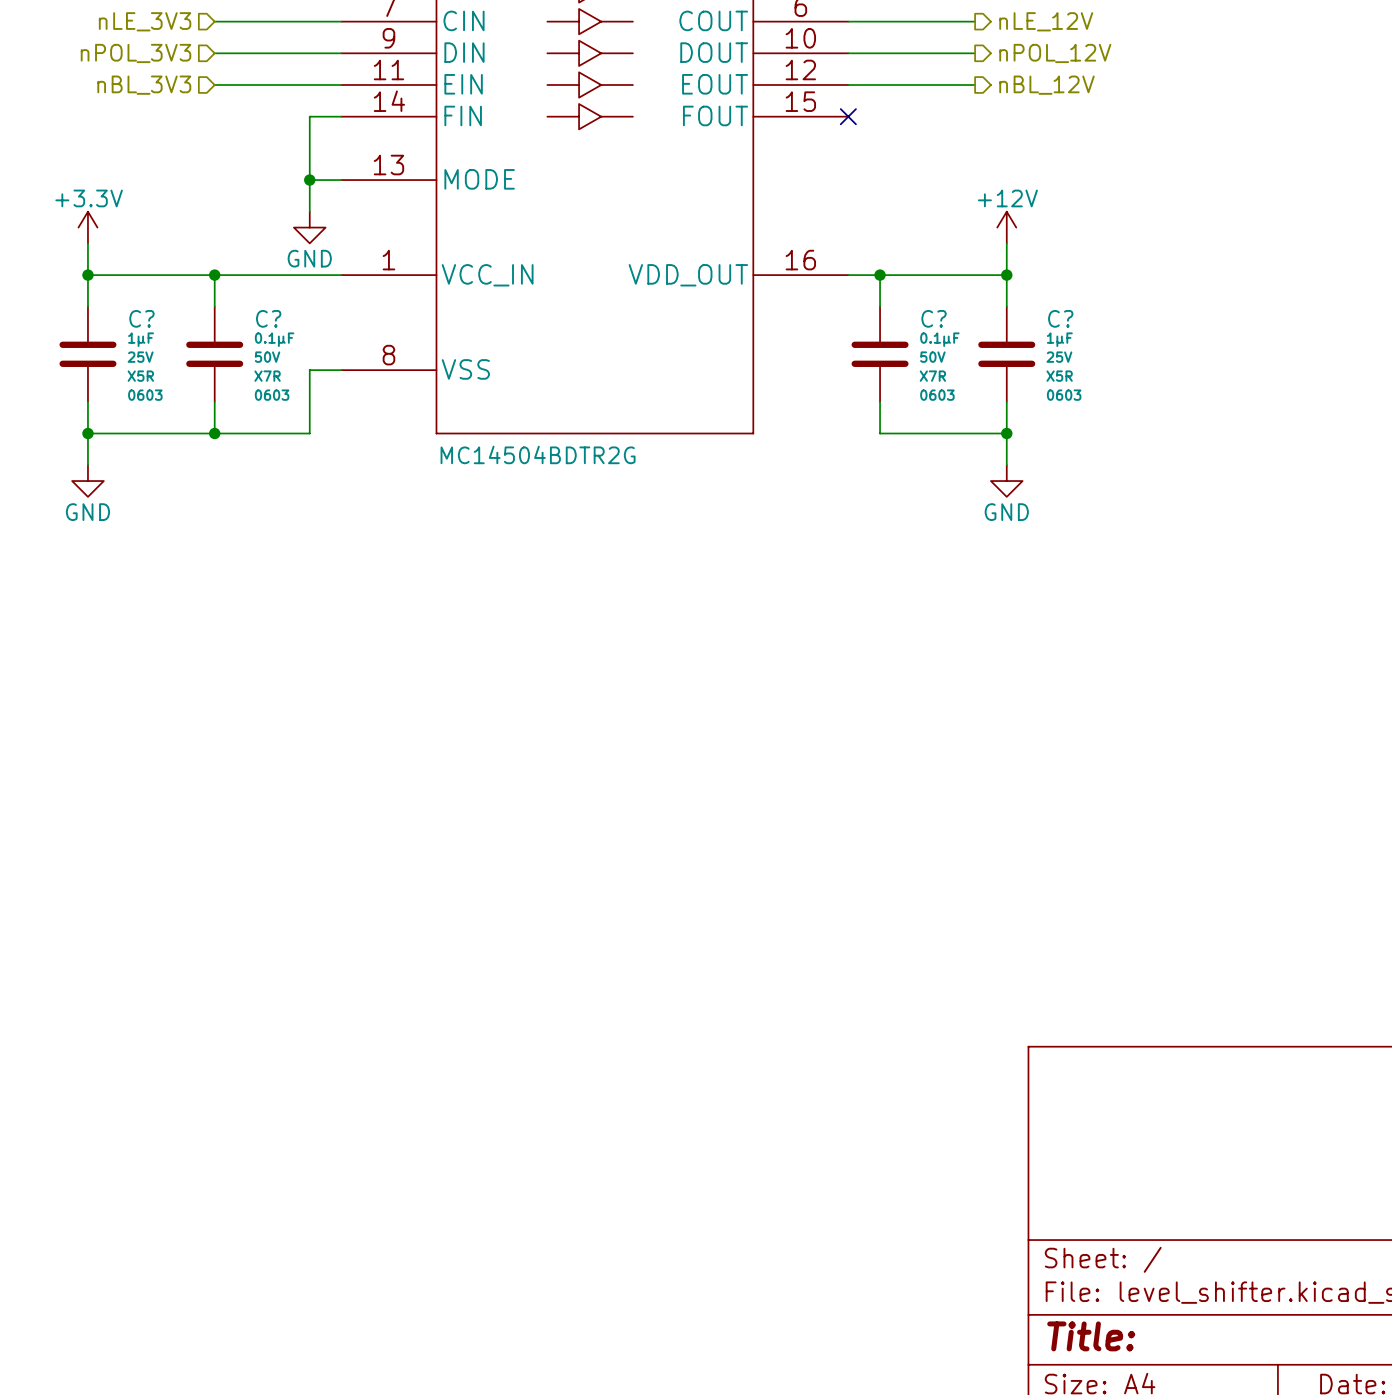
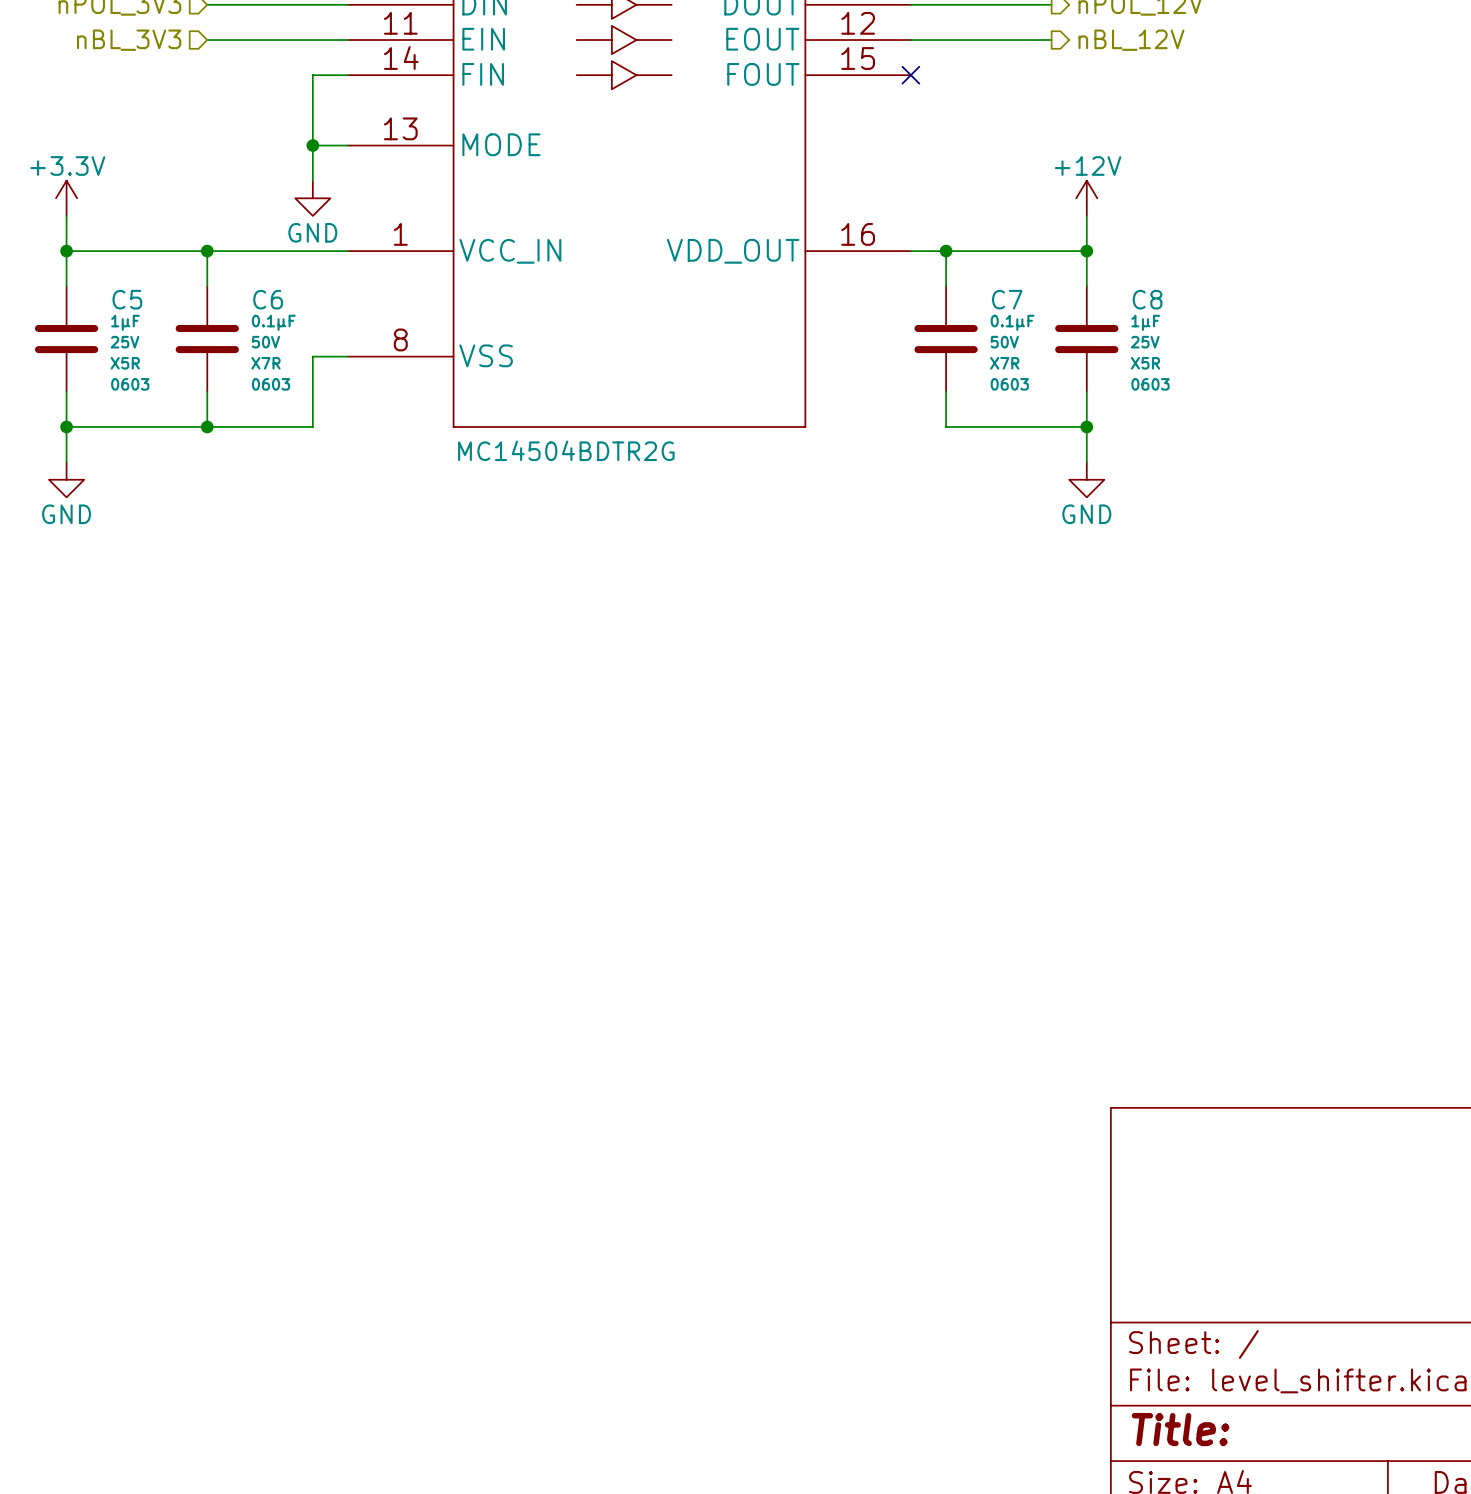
C? name: C? (141, 318) -> C5 (127, 299)
C? name: C? (268, 318) -> C6 (268, 299)
C? name: C? (934, 318) -> C7 (1007, 299)
C? name: C? (1060, 318) -> C8 (1147, 299)

